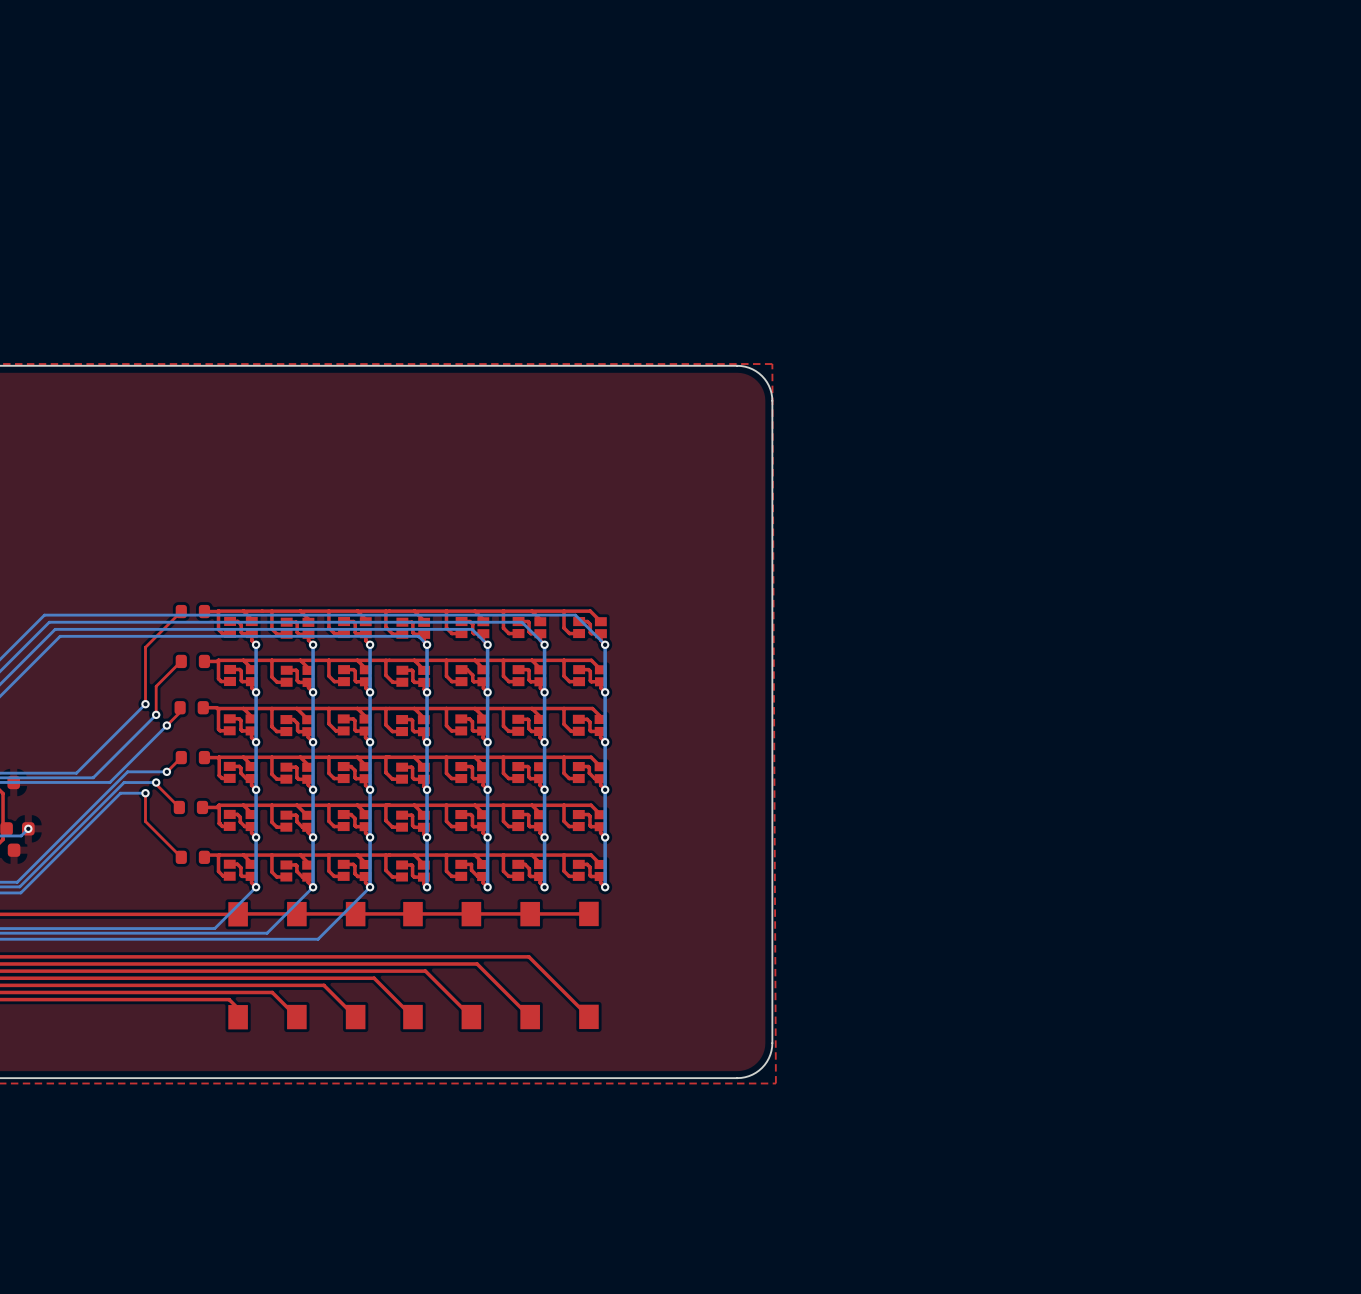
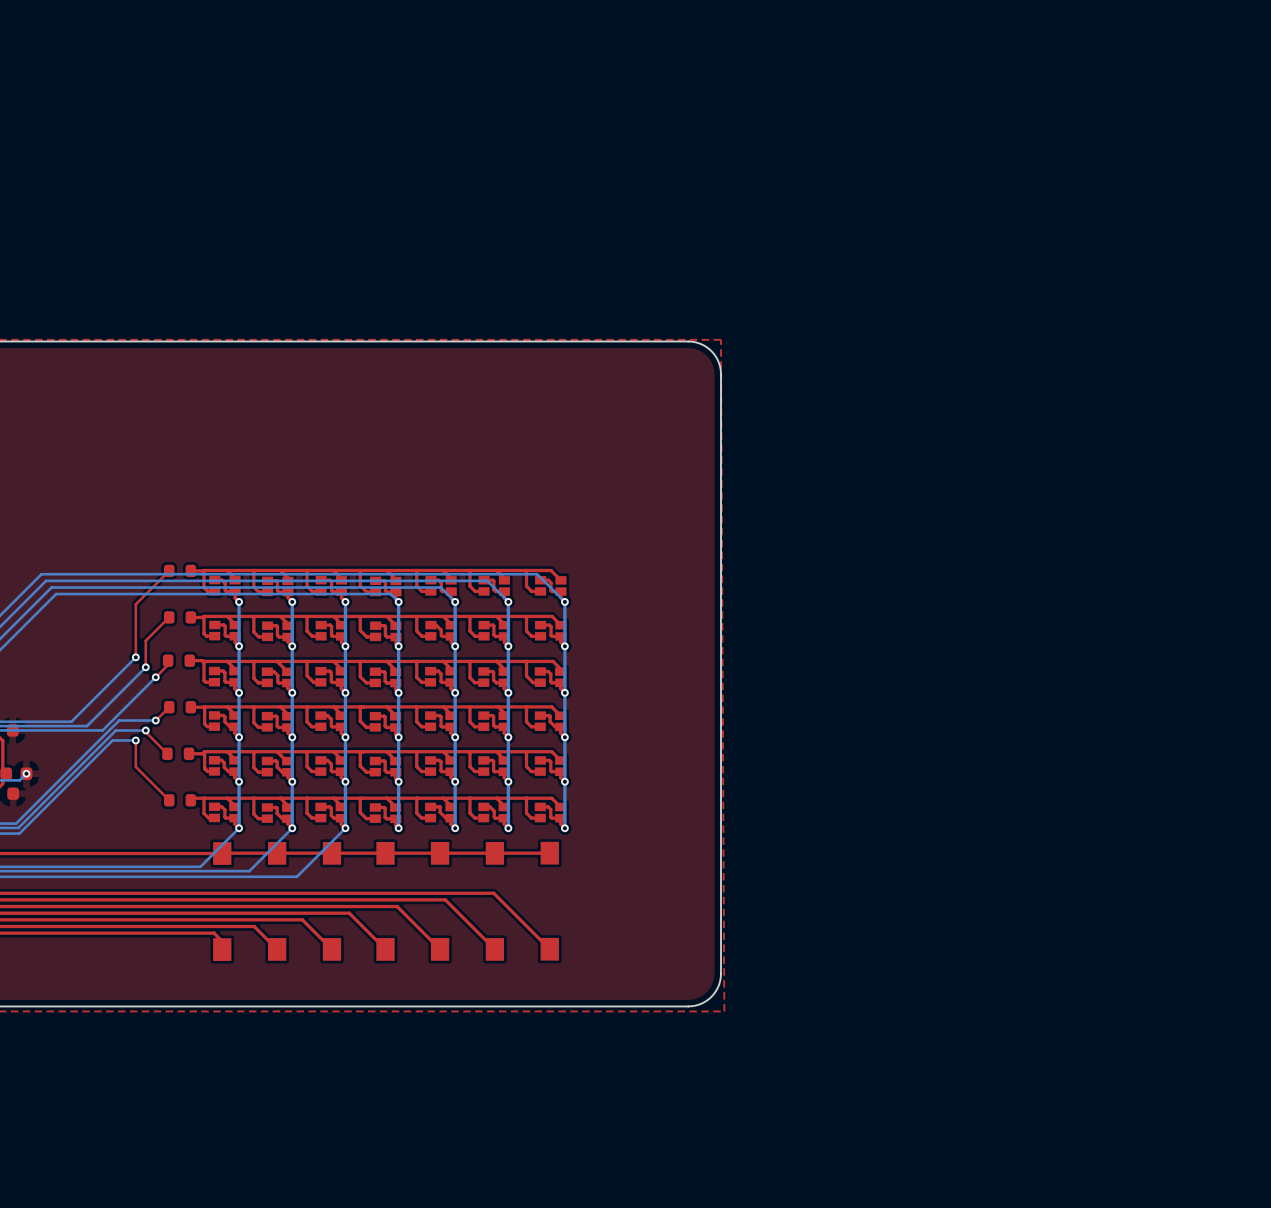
top track: none -> (498, 706) (504, 712) (504, 715)

